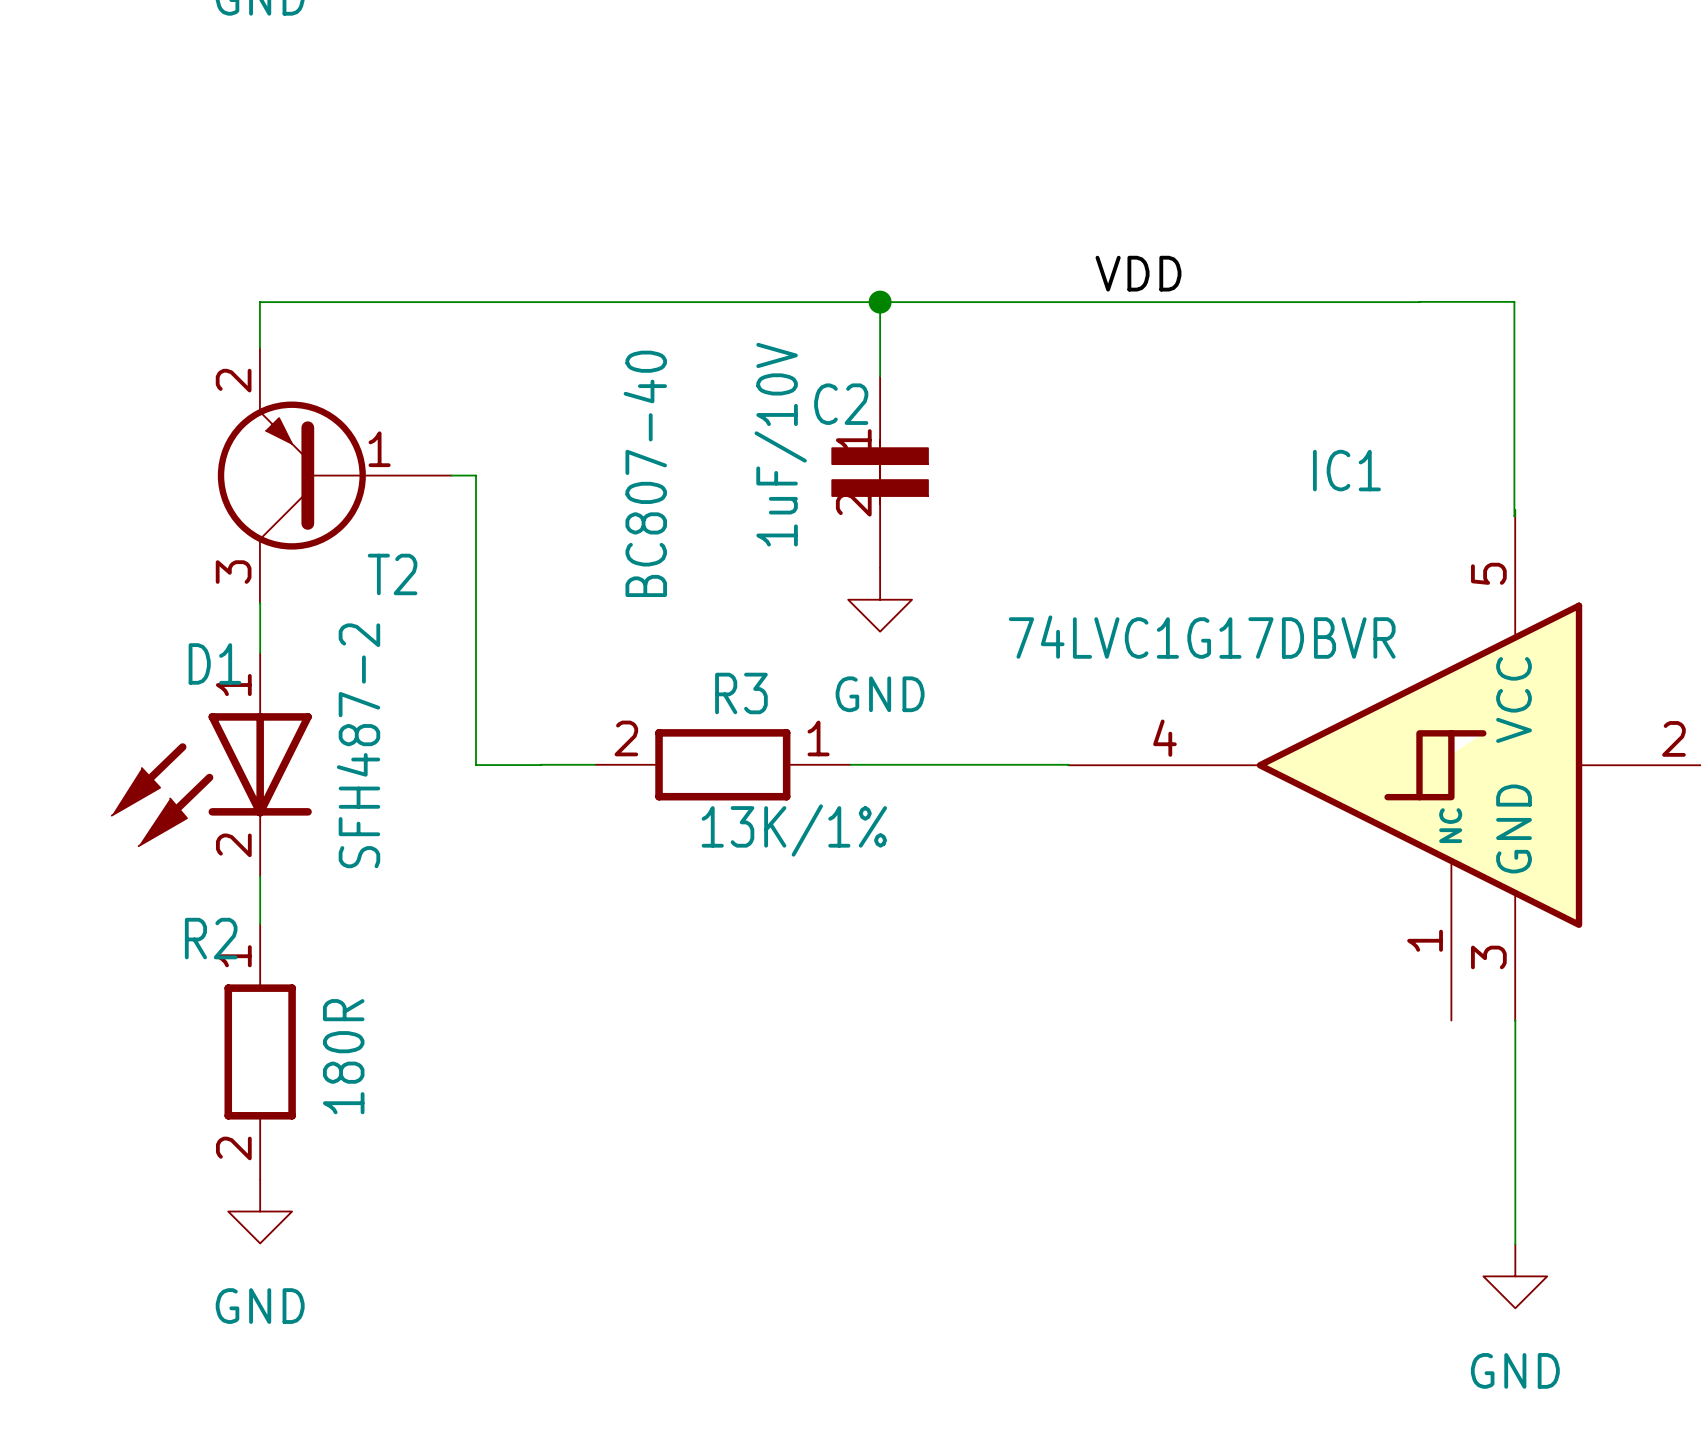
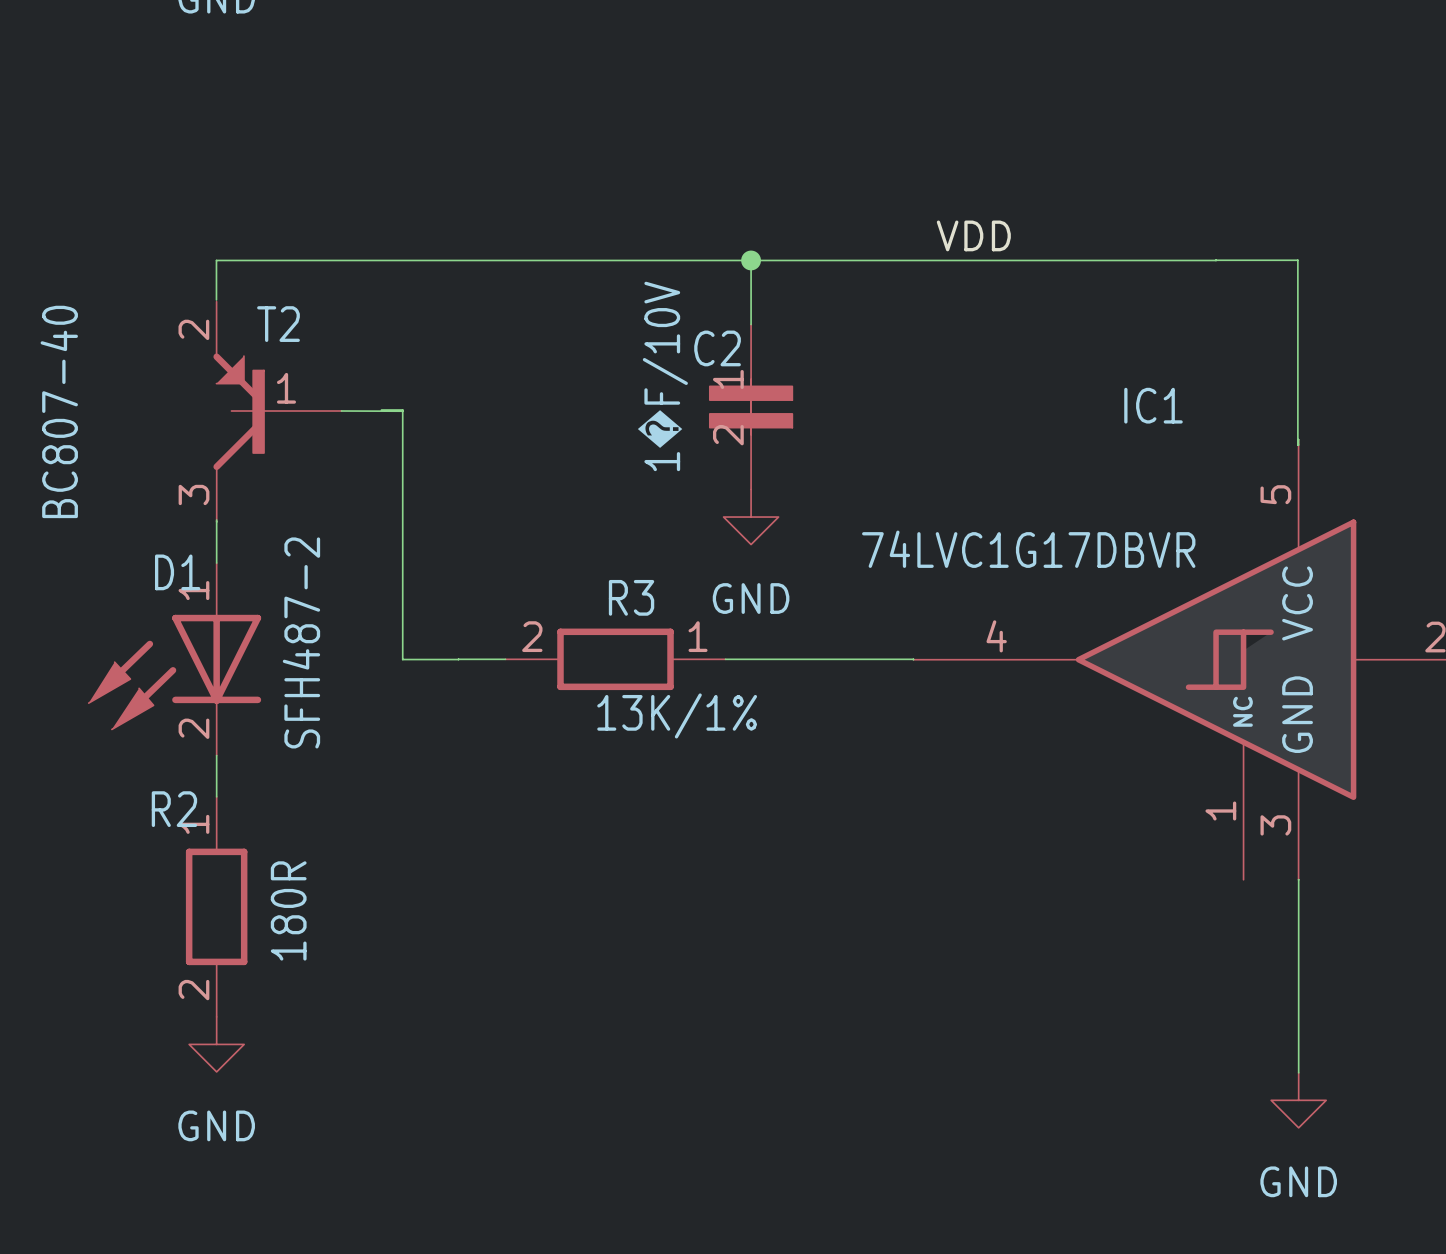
T2 symbol: [217, 347, 452, 604] -> [213, 301, 342, 522]
C2 value: 1uF/10V (780, 444) -> 1�F/10V (662, 376)
T2 value position: BC807-40 (645, 473) -> BC807-40 (59, 411)
wire: none -> (341, 411) (402, 411)
T2 name position: T2 (392, 574) -> T2 (278, 324)

